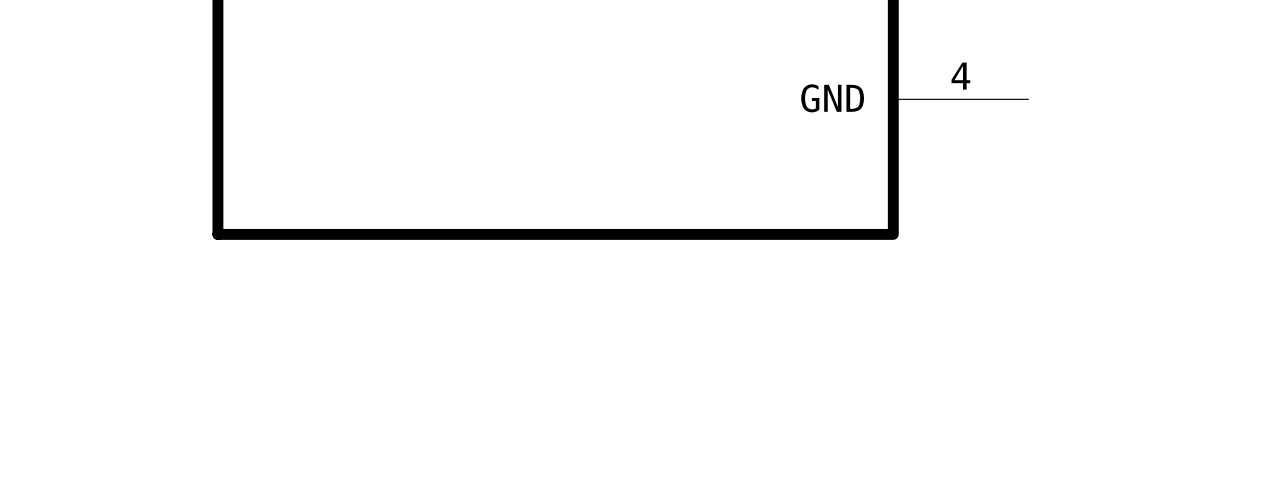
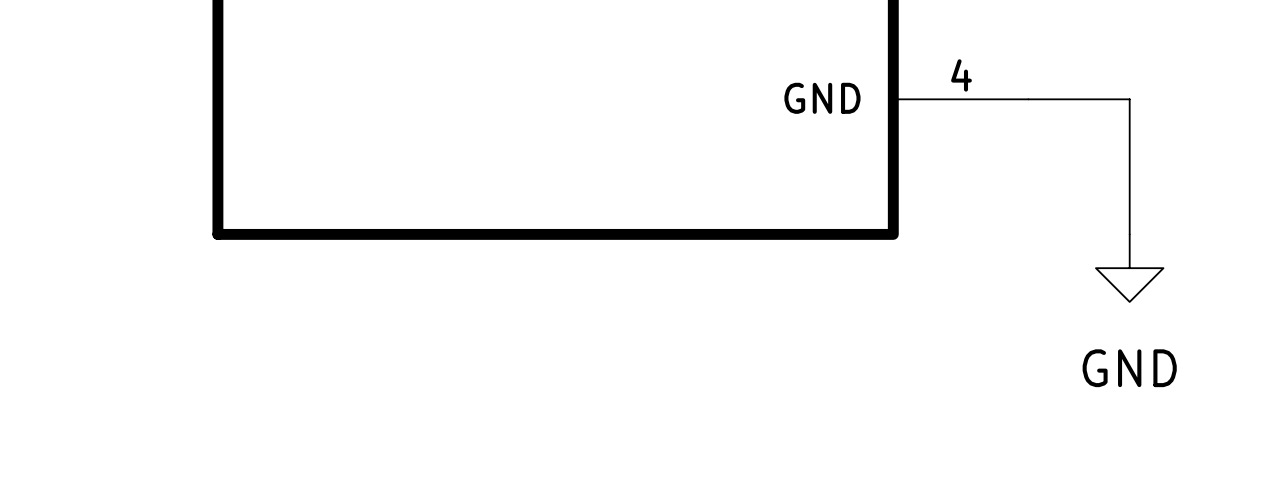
wire: none -> (1028, 99) (1129, 99) (1129, 234)
power symbol: none -> GND (1129, 268)

